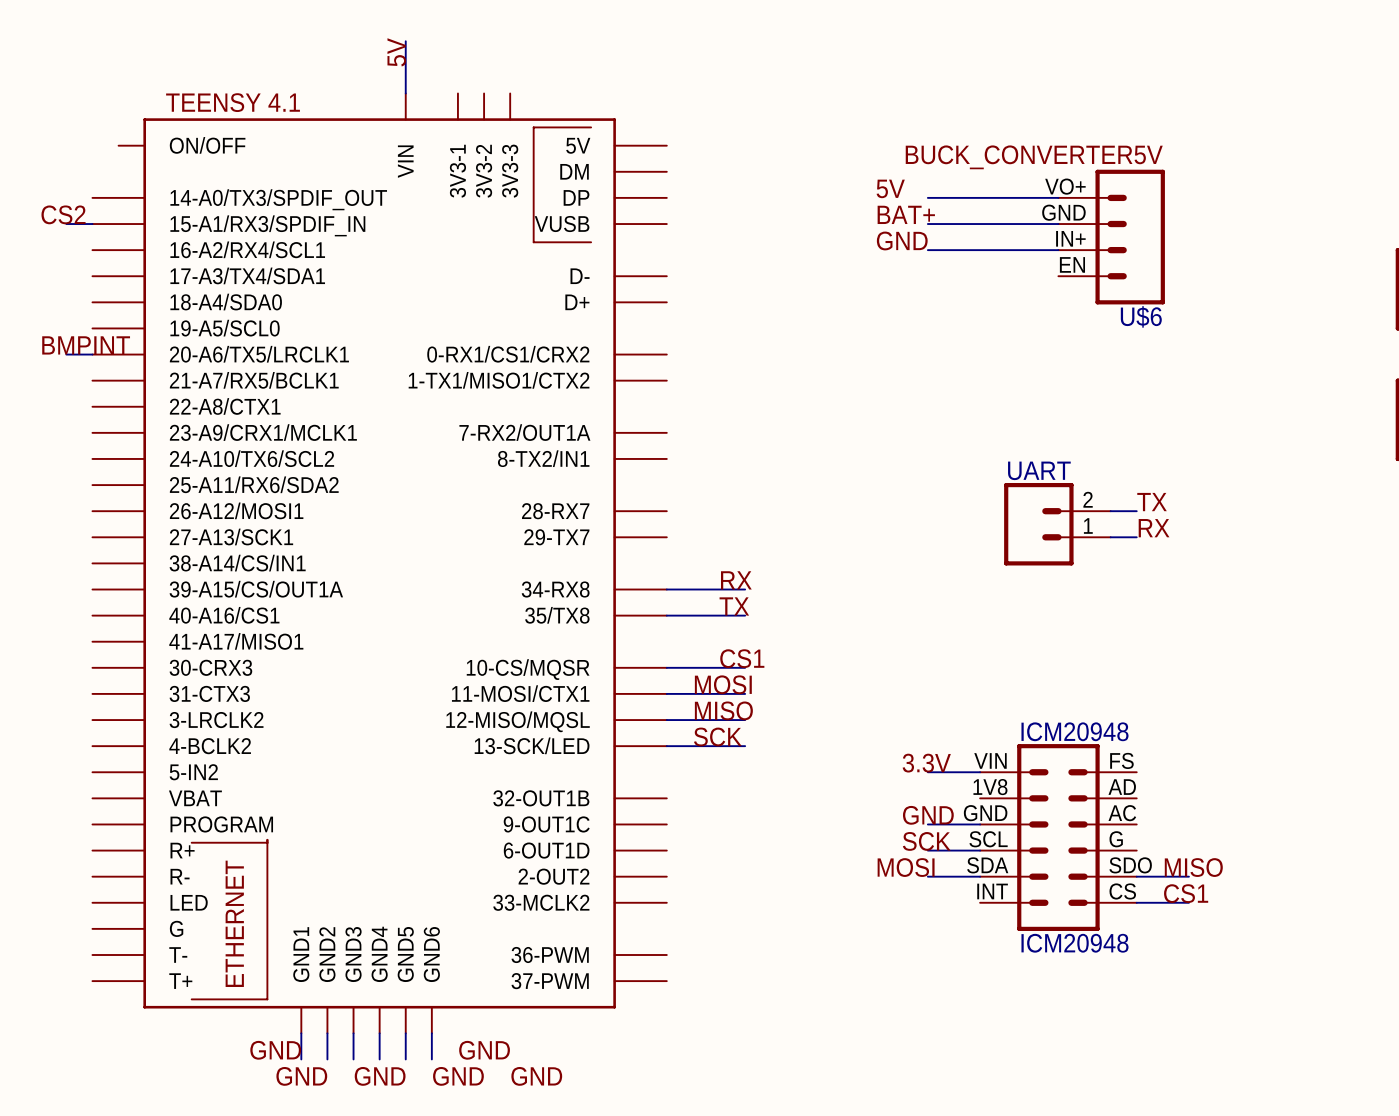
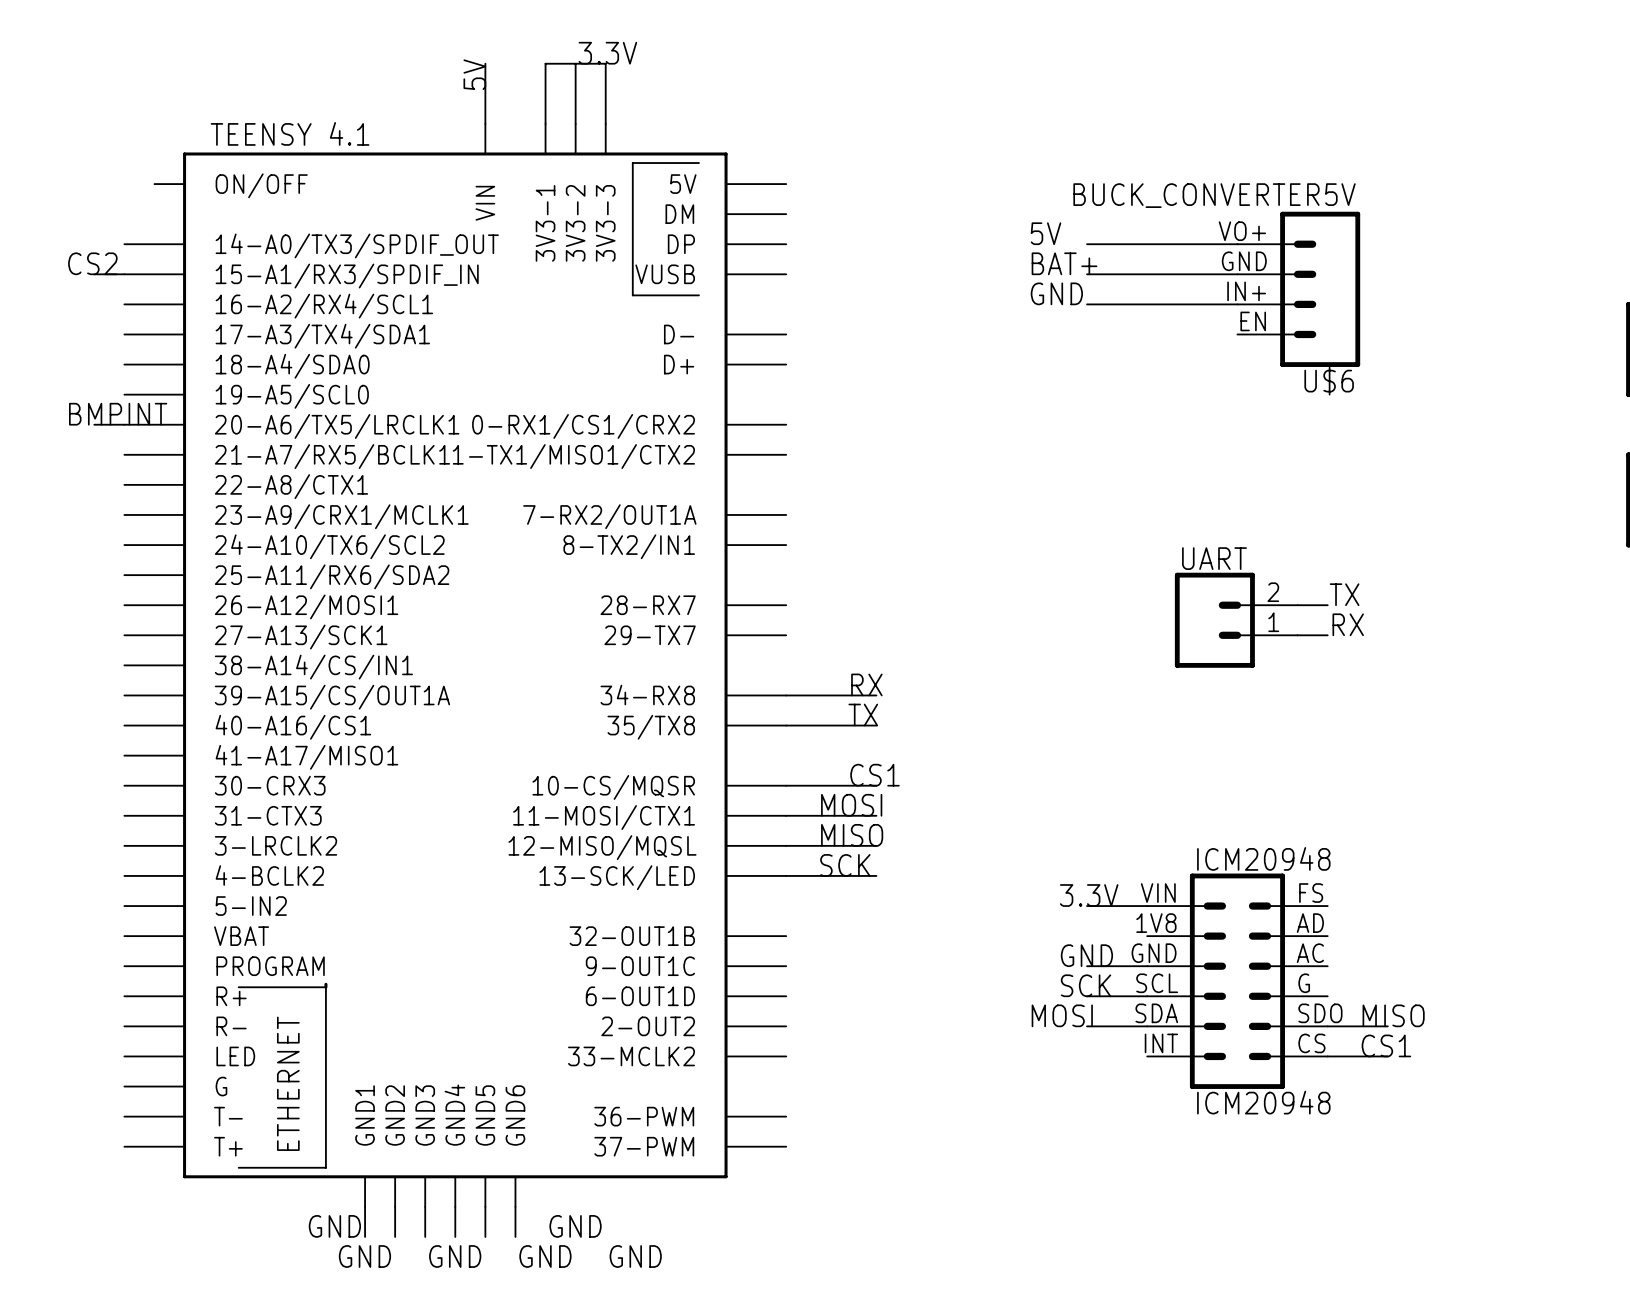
label: none -> 3.3V (607, 53)
wire: none -> (575, 63) (575, 123)
wire: none -> (545, 123) (545, 63) (605, 63) (605, 123)

